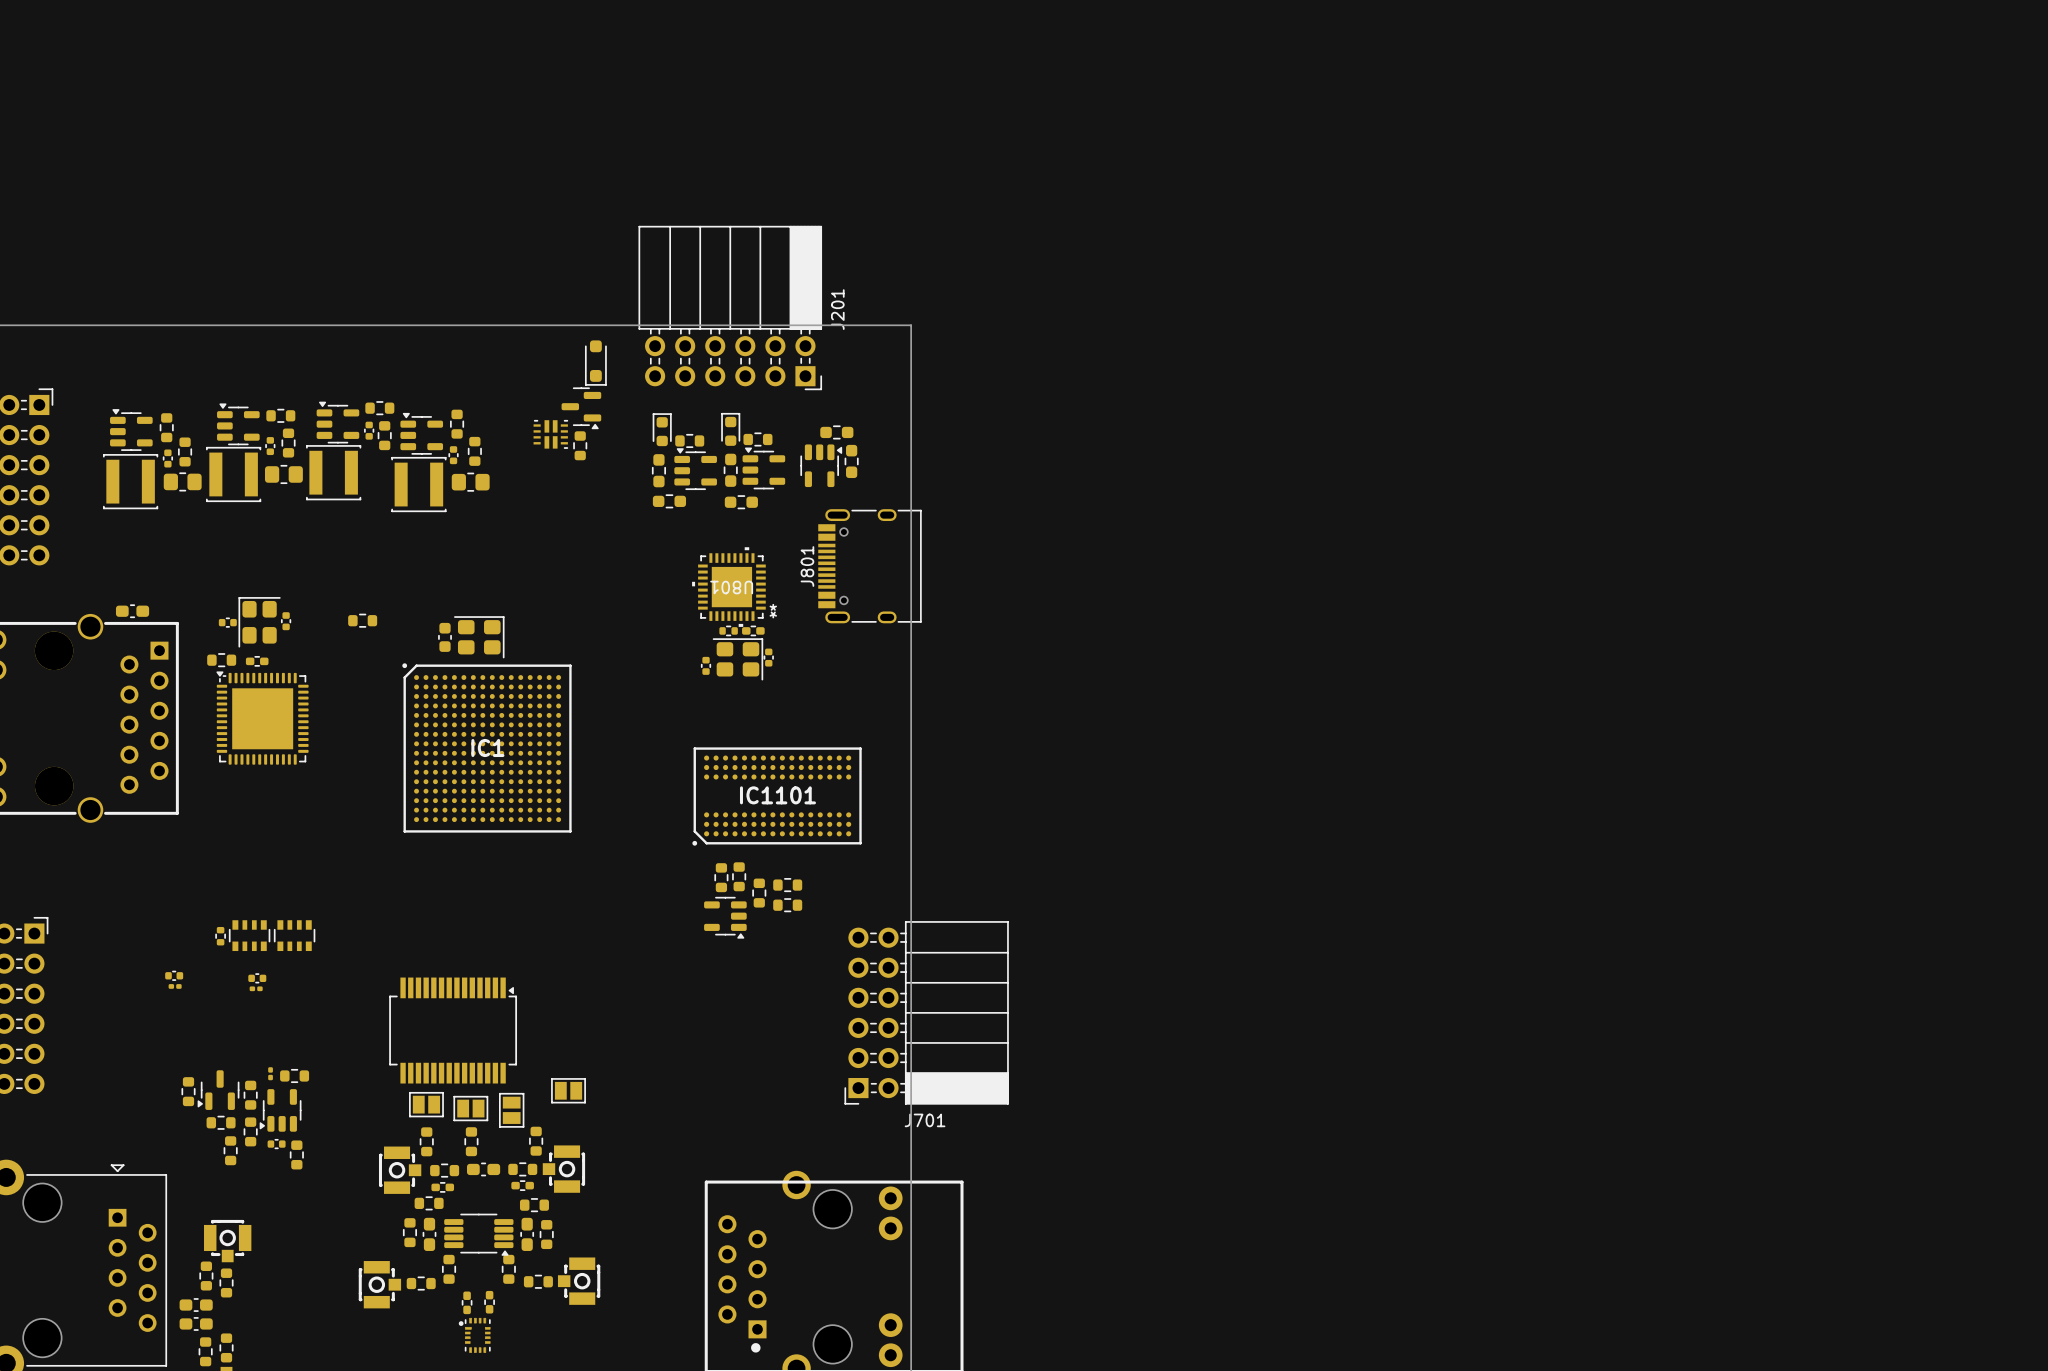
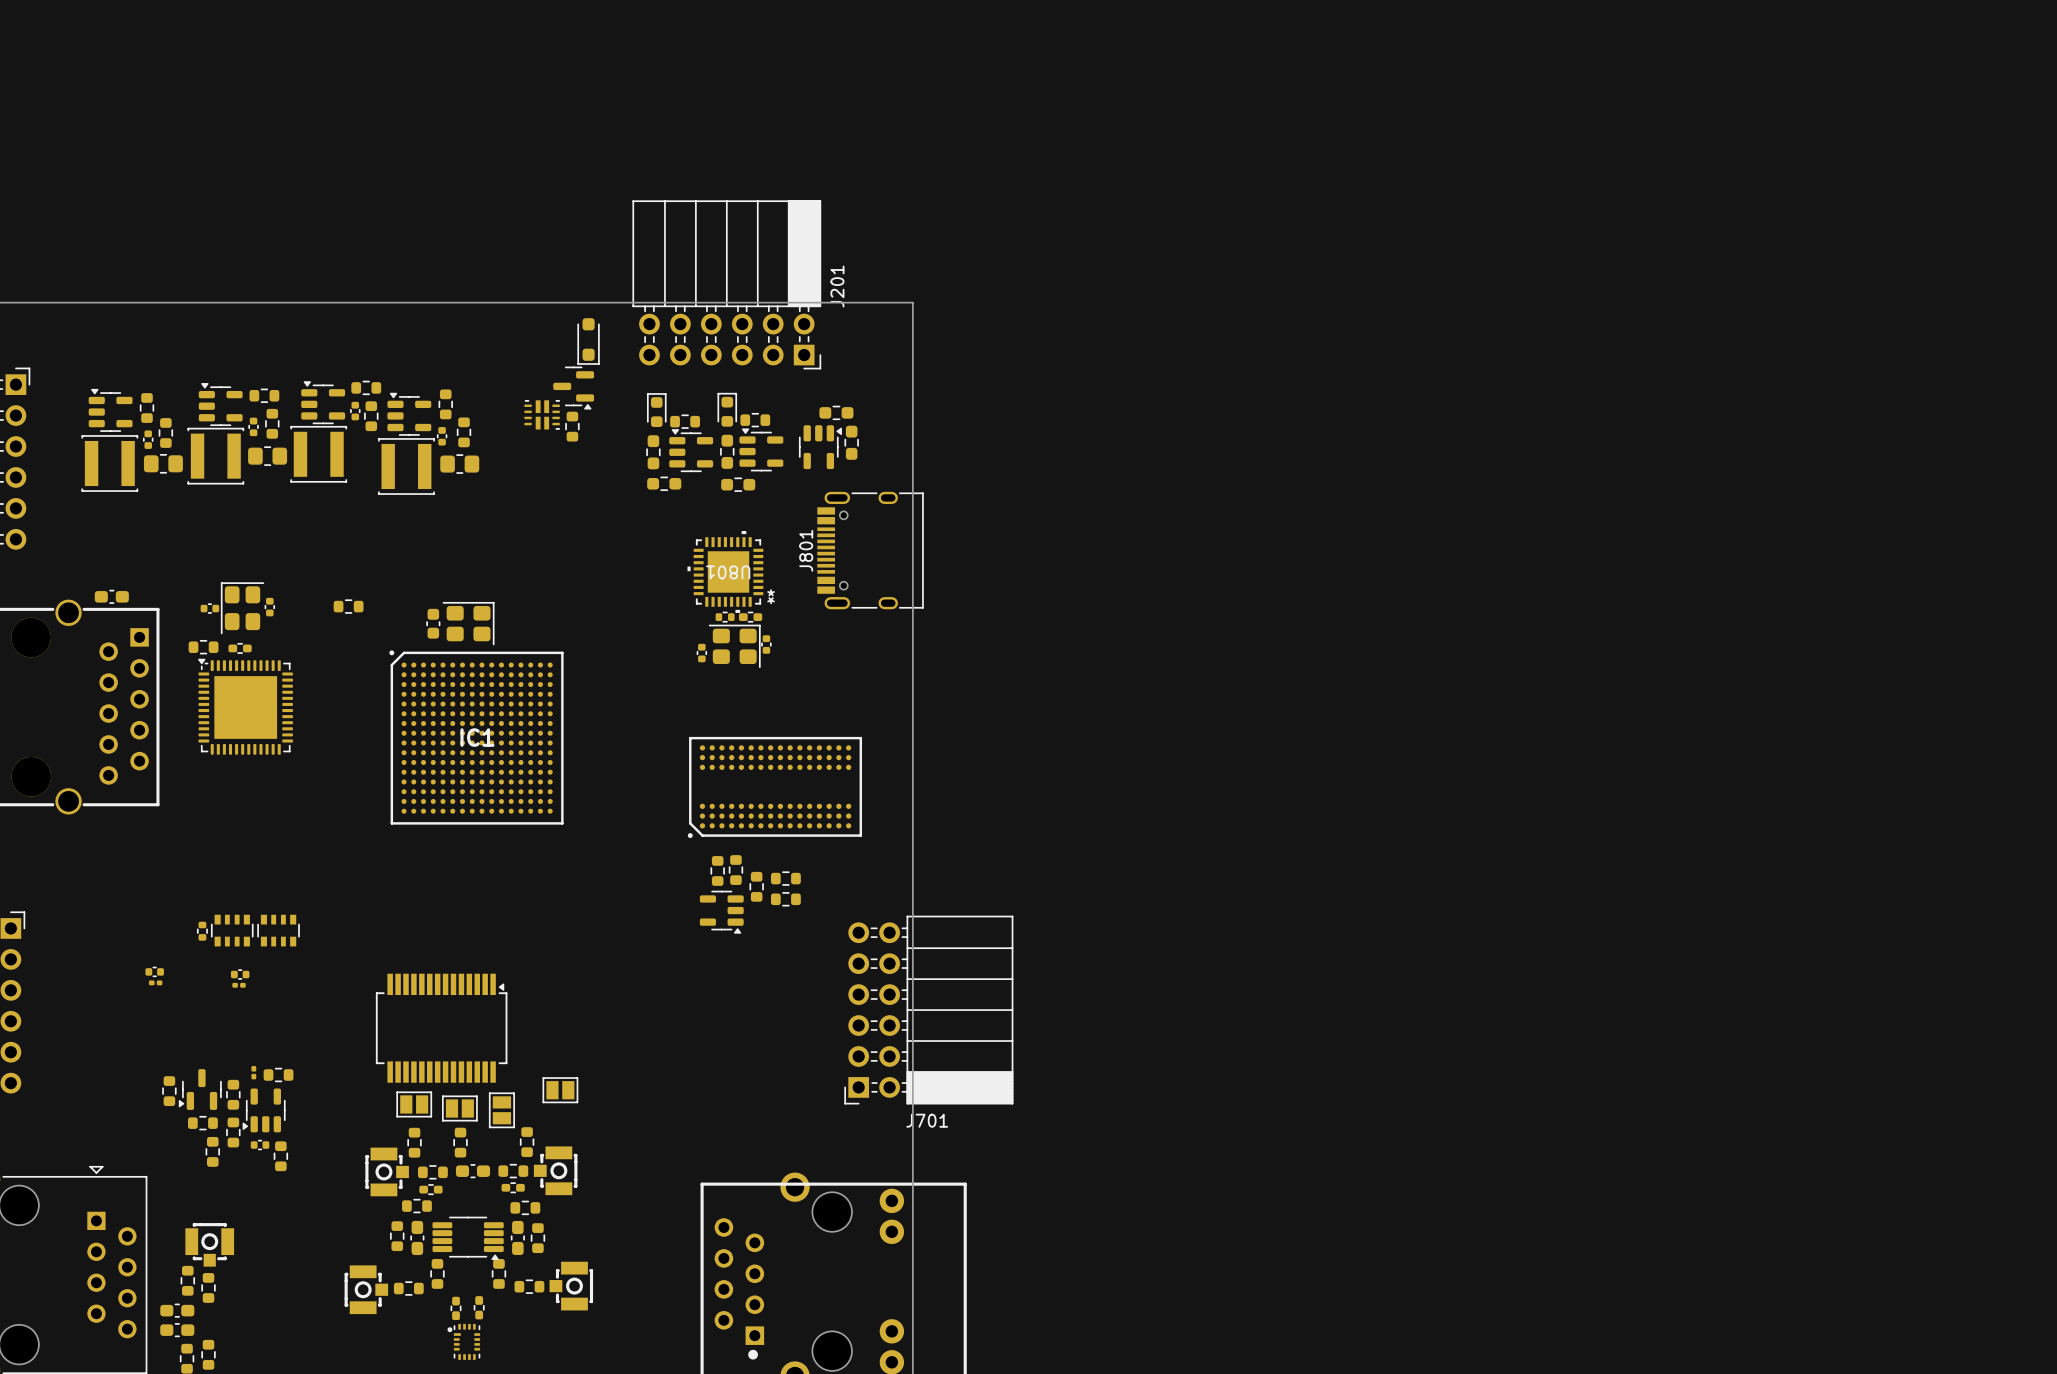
IC1101 name: IC1101 (777, 795) -> none

